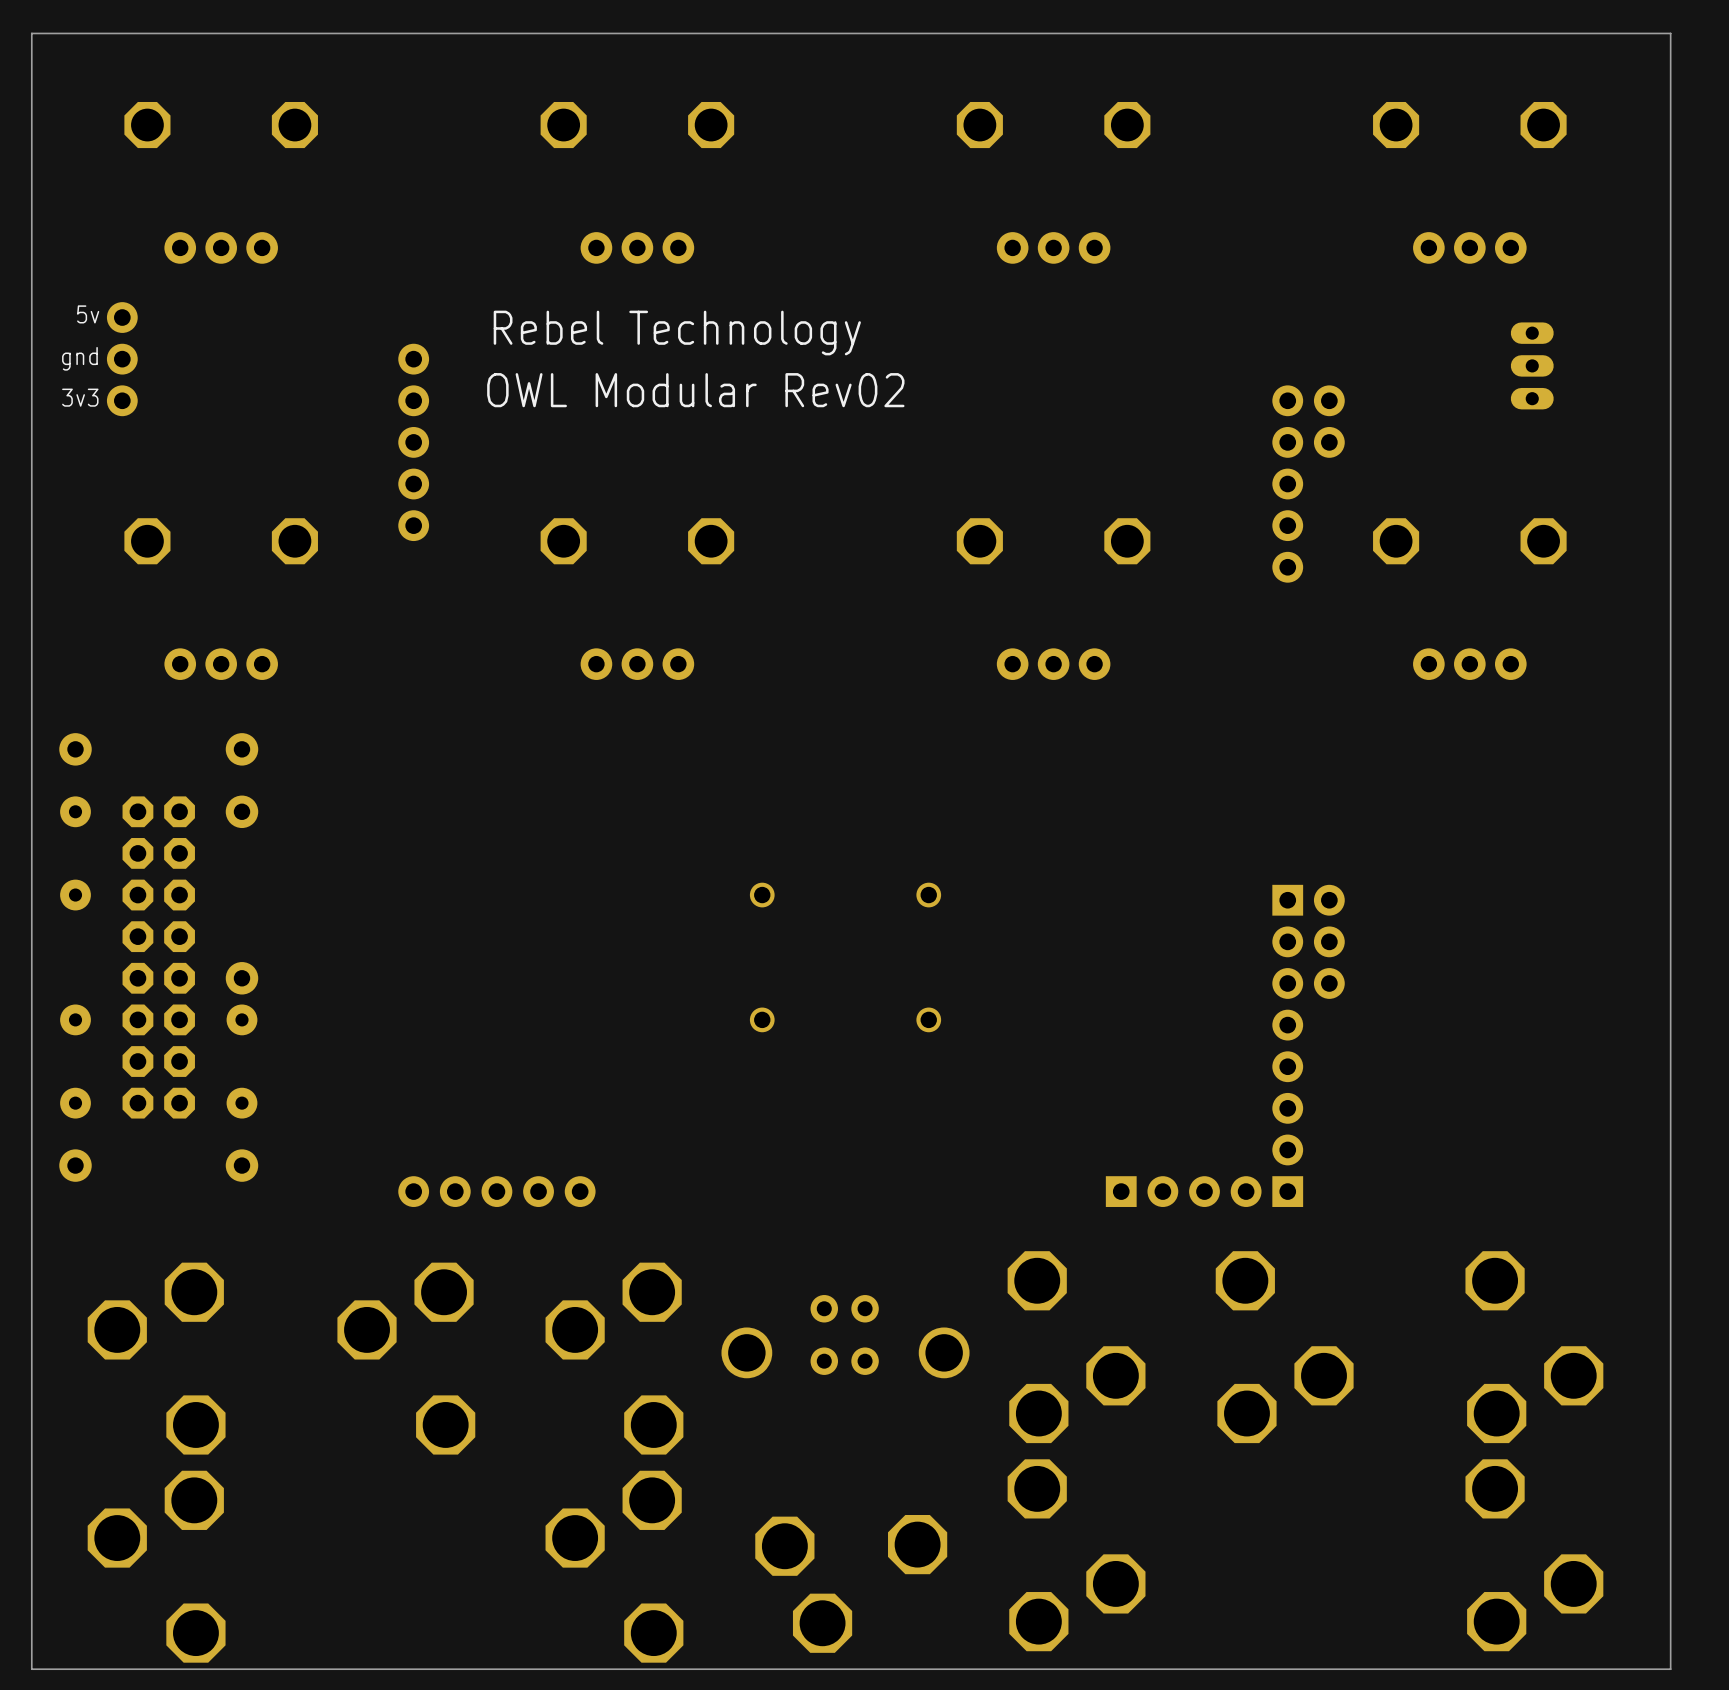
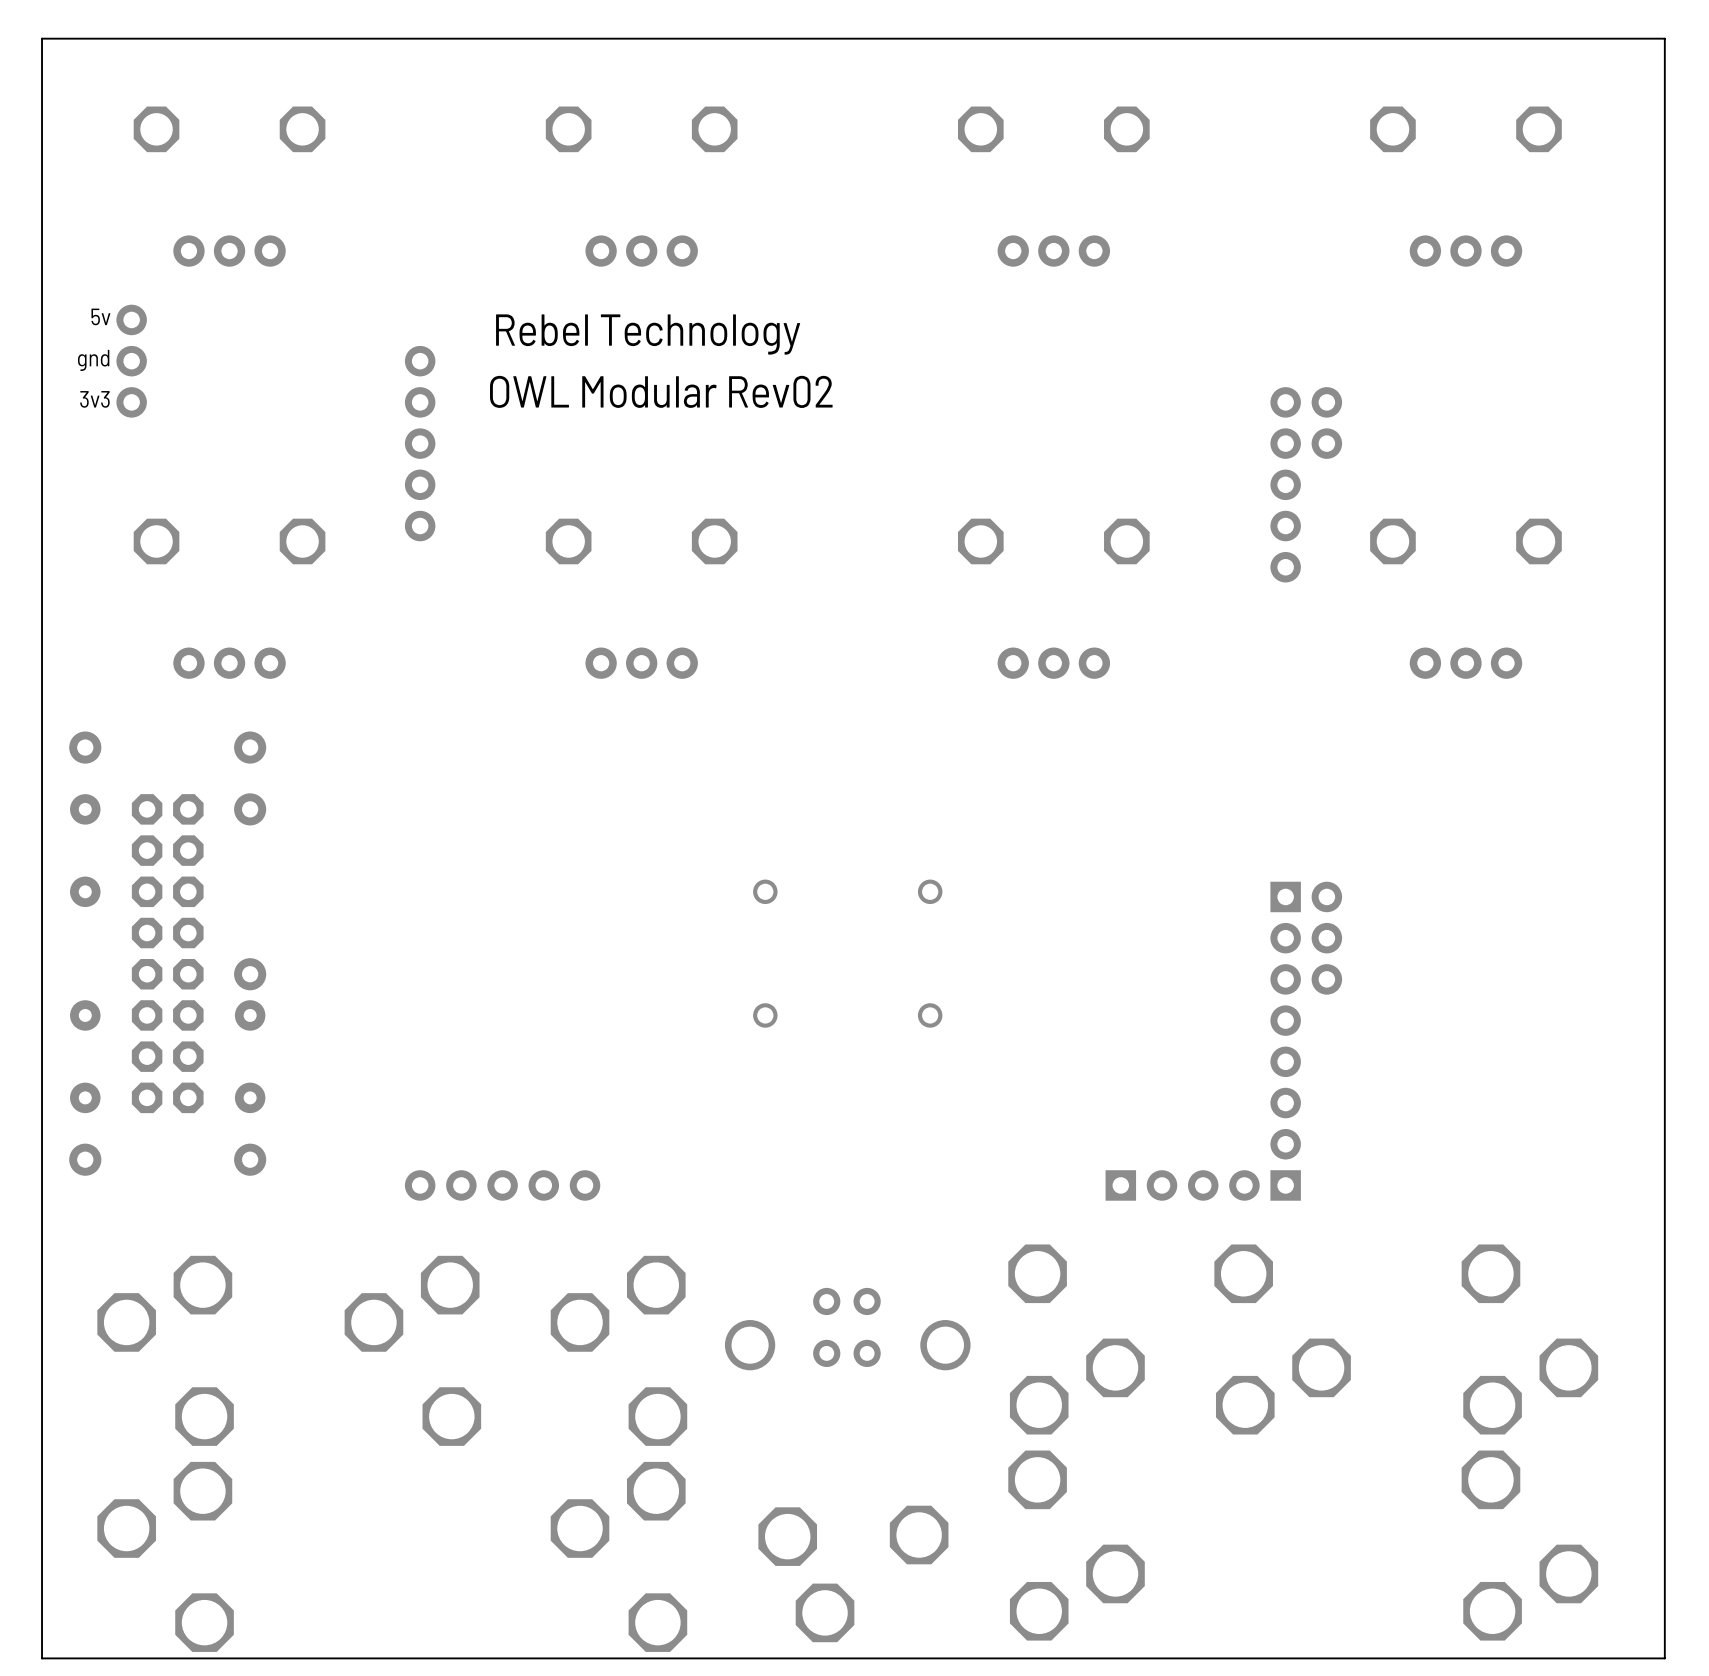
part: (1532, 365) -> none

